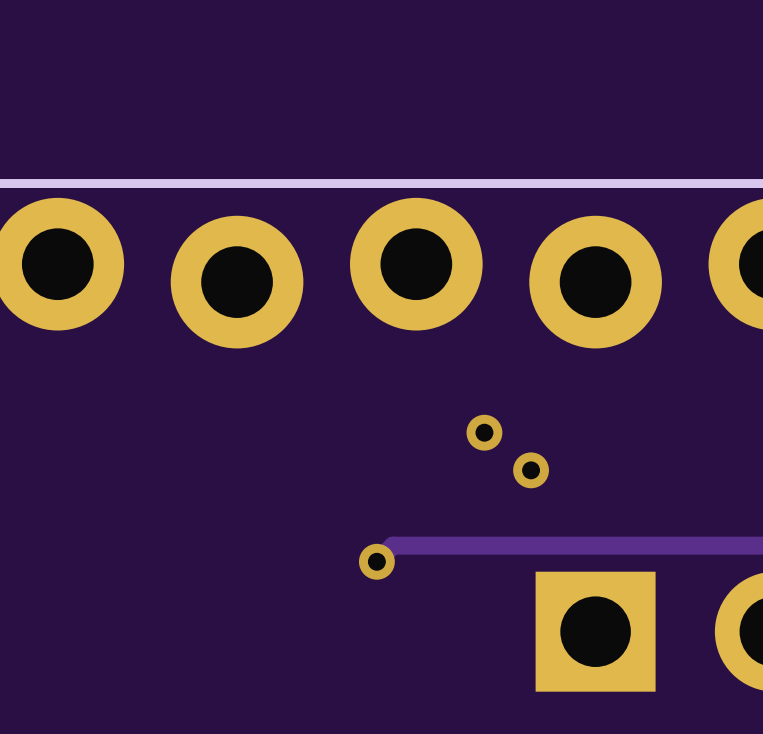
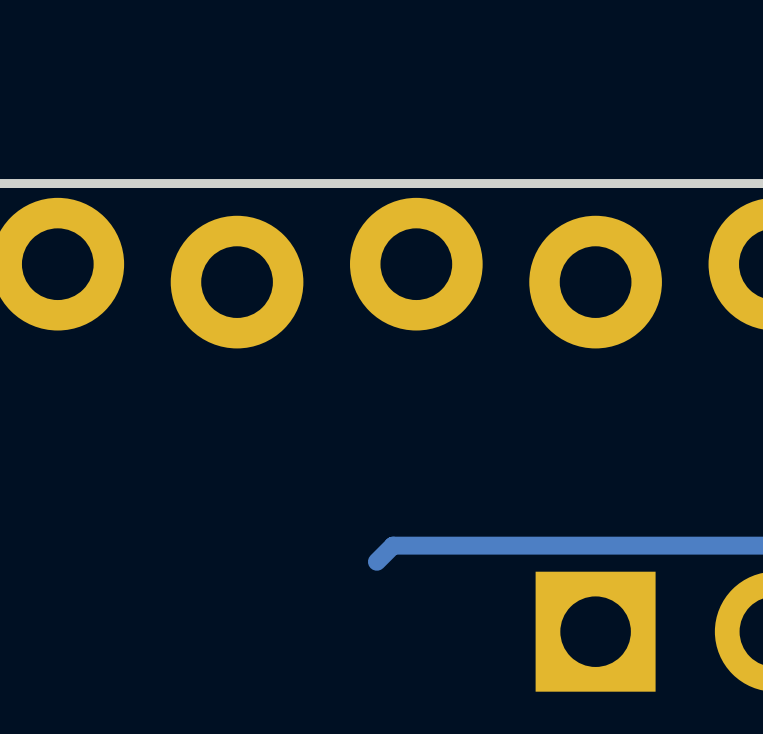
via: (484, 432) -> none
via: (531, 470) -> none
via: (376, 561) -> none

